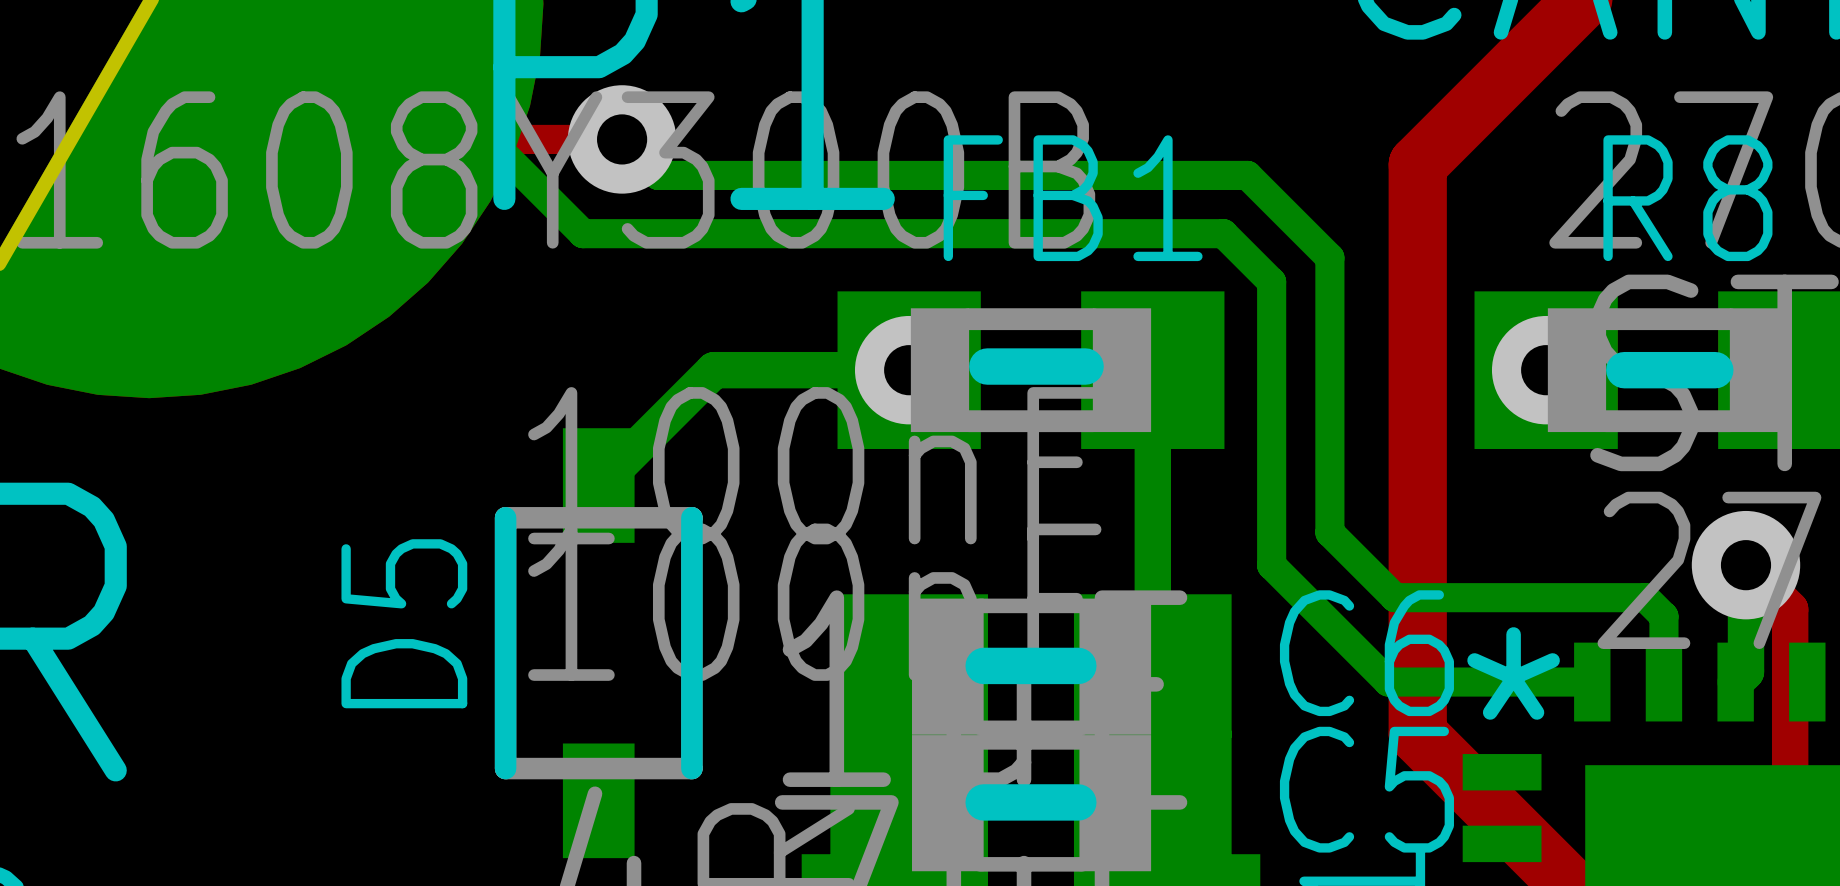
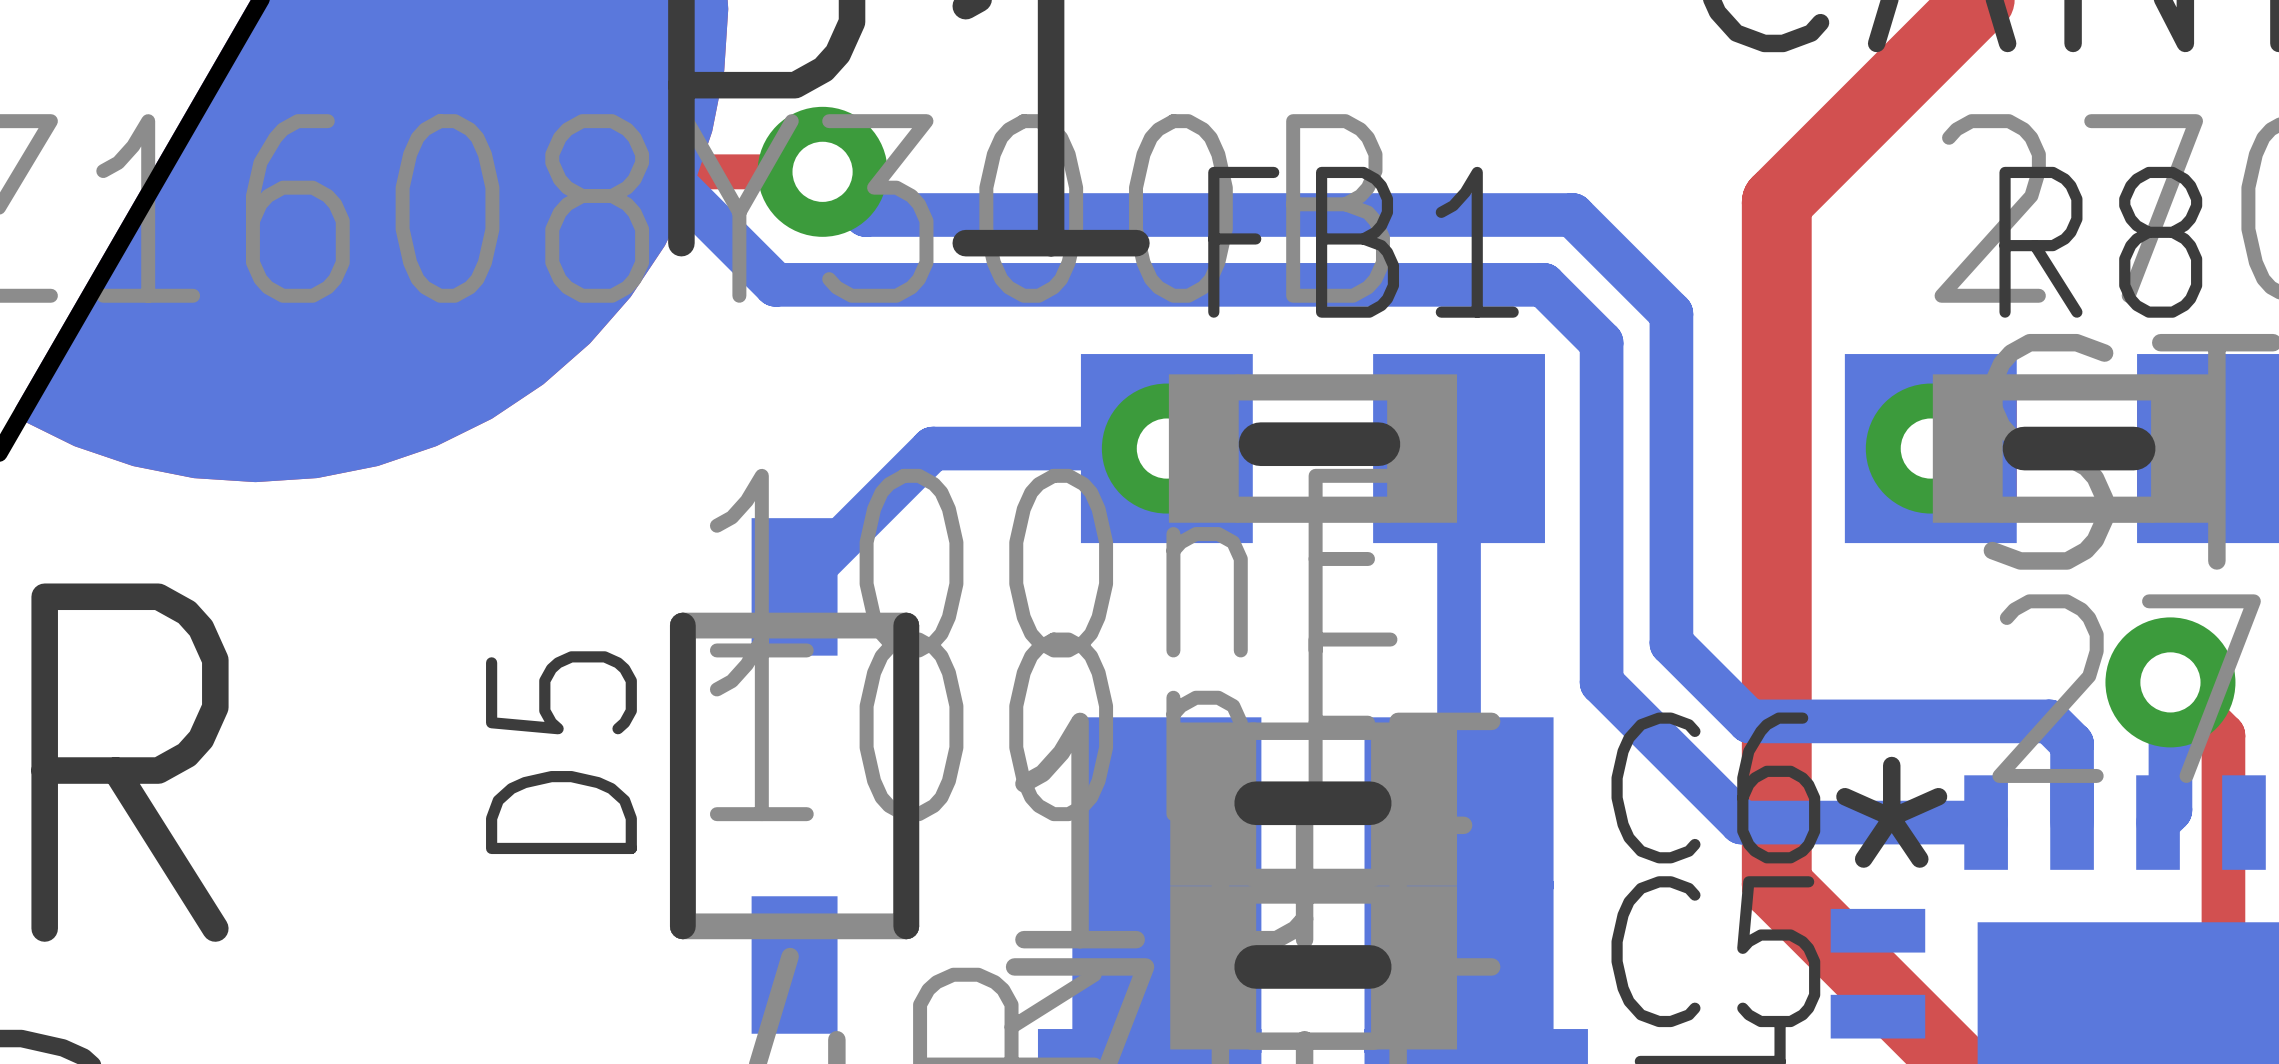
bottom track width: thin (235, 54) (403, 54) (583, 233) (1223, 233) (1271, 281) (1271, 565) (1388, 682) (1592, 682) -> thick (358, 69) (560, 69) (775, 284) (1543, 284) (1601, 342) (1601, 682) (1741, 822) (1986, 822)
bottom track width: thin (622, 139) (658, 175) (1247, 175) (1329, 257) (1329, 532) (1394, 597) (1645, 597) (1663, 616) (1663, 682) -> thick (822, 171) (865, 215) (1572, 215) (1671, 313) (1671, 643) (1749, 721) (2049, 721) (2072, 743) (2072, 822)

